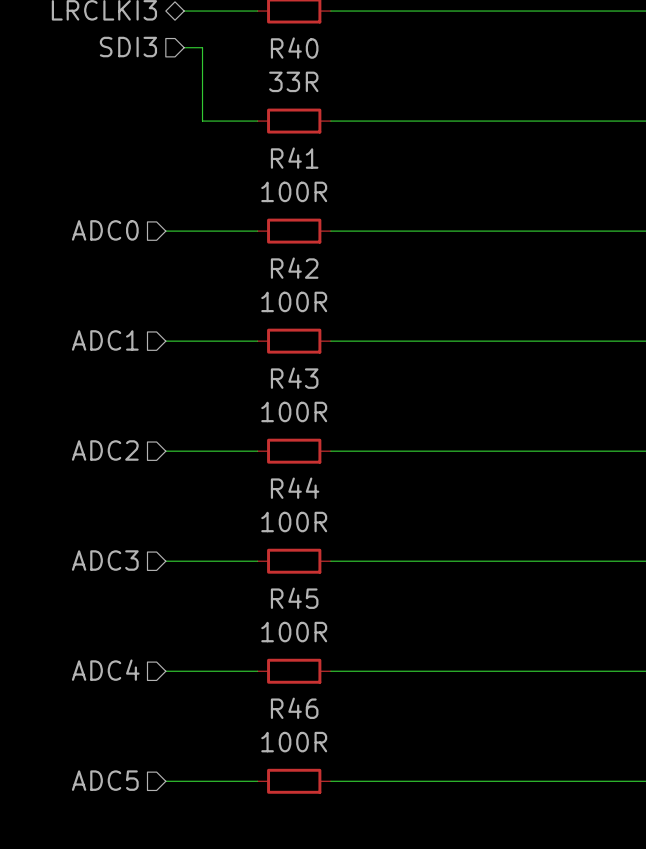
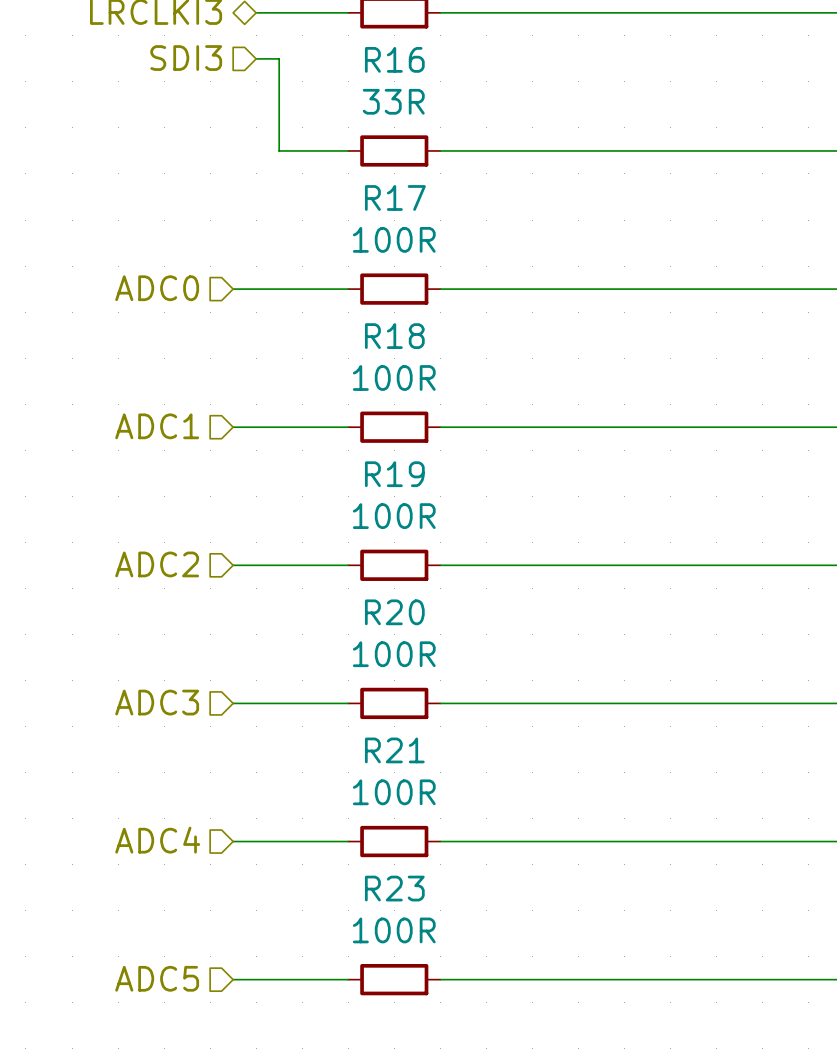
R40 name: R40 (294, 48) -> R16 (394, 59)
R41 name: R41 (294, 158) -> R17 (395, 197)
R42 name: R42 (294, 268) -> R18 (394, 336)
R43 name: R43 (294, 378) -> R19 (394, 474)
R44 name: R44 (295, 488) -> R20 (394, 612)
R45 name: R45 (294, 598) -> R21 (394, 750)
R46 name: R46 (294, 708) -> R23 (394, 888)

